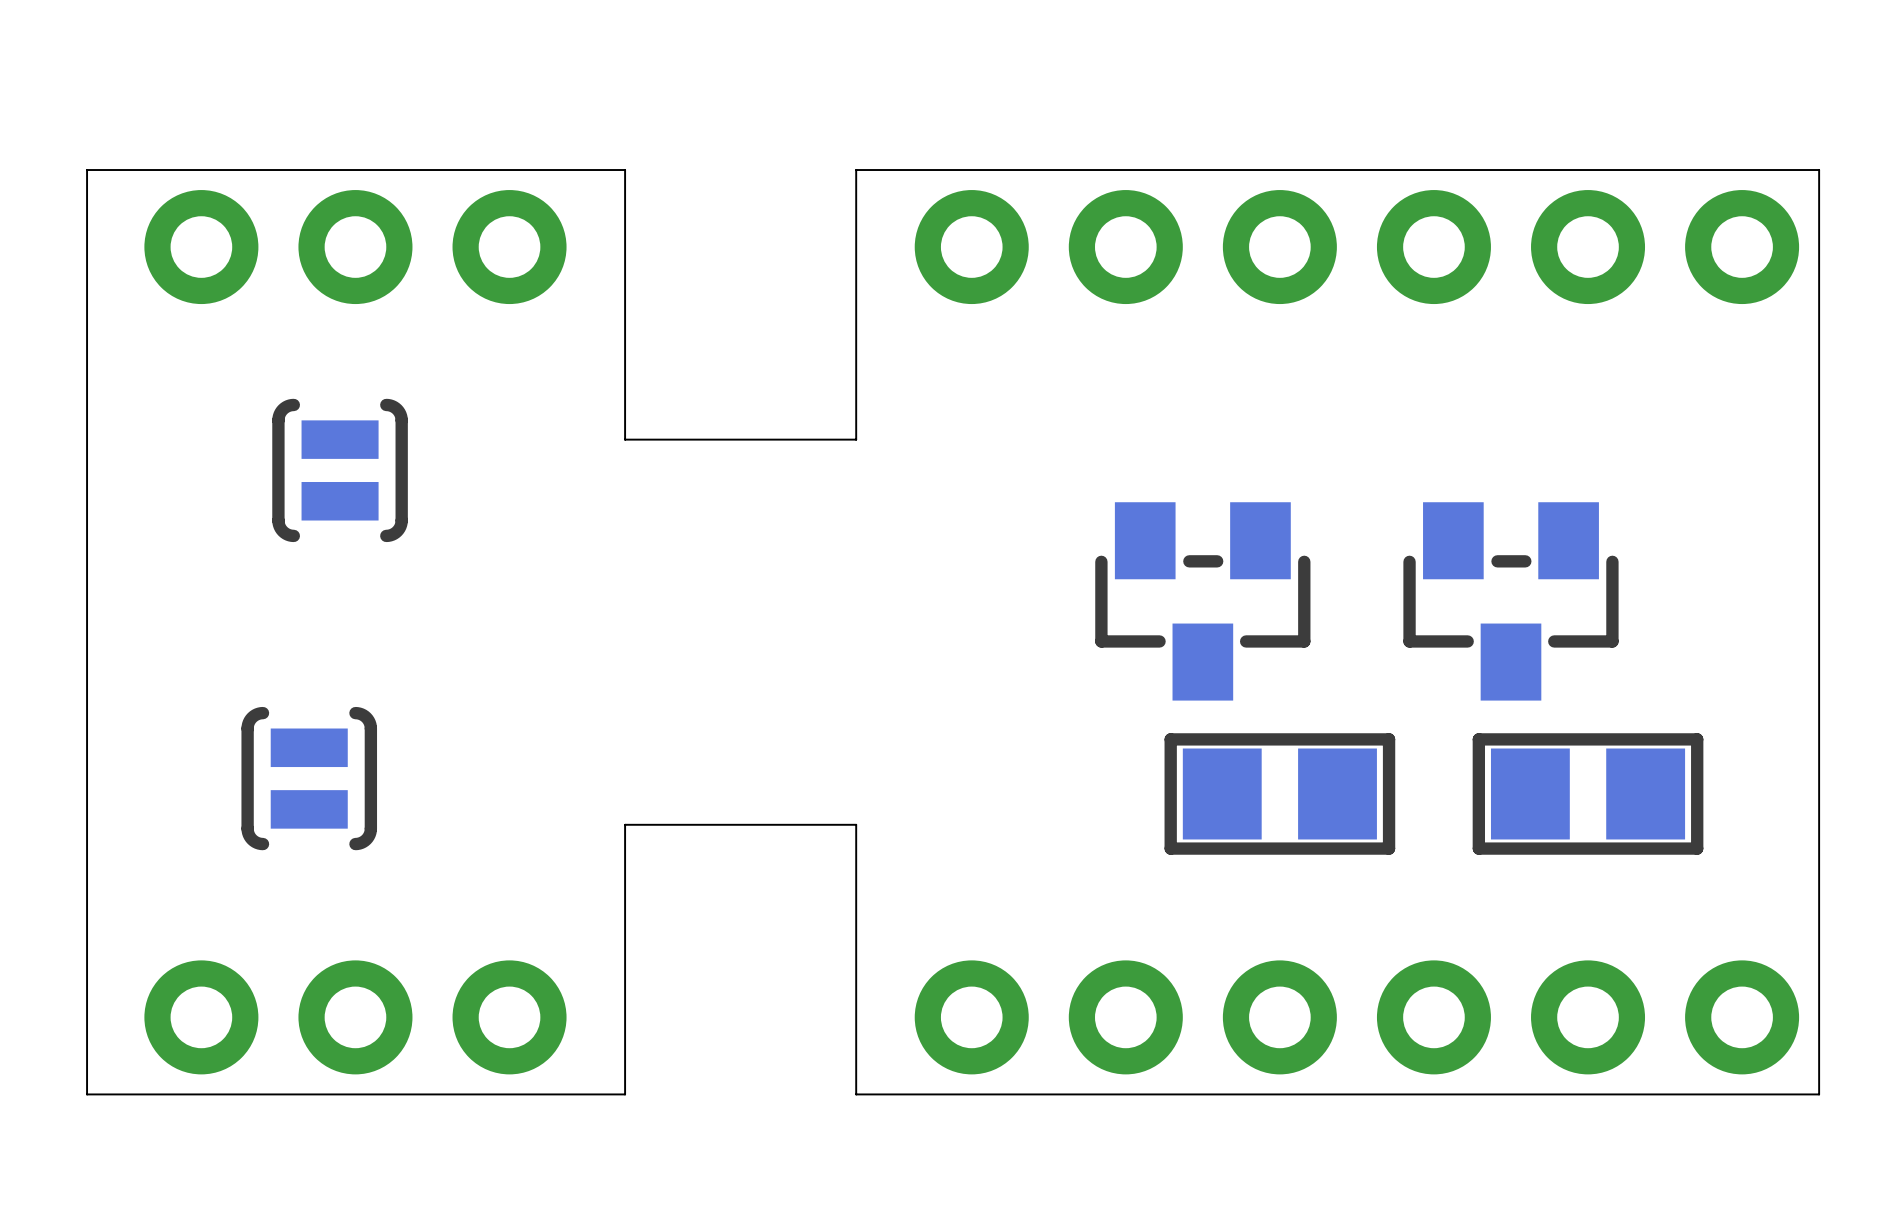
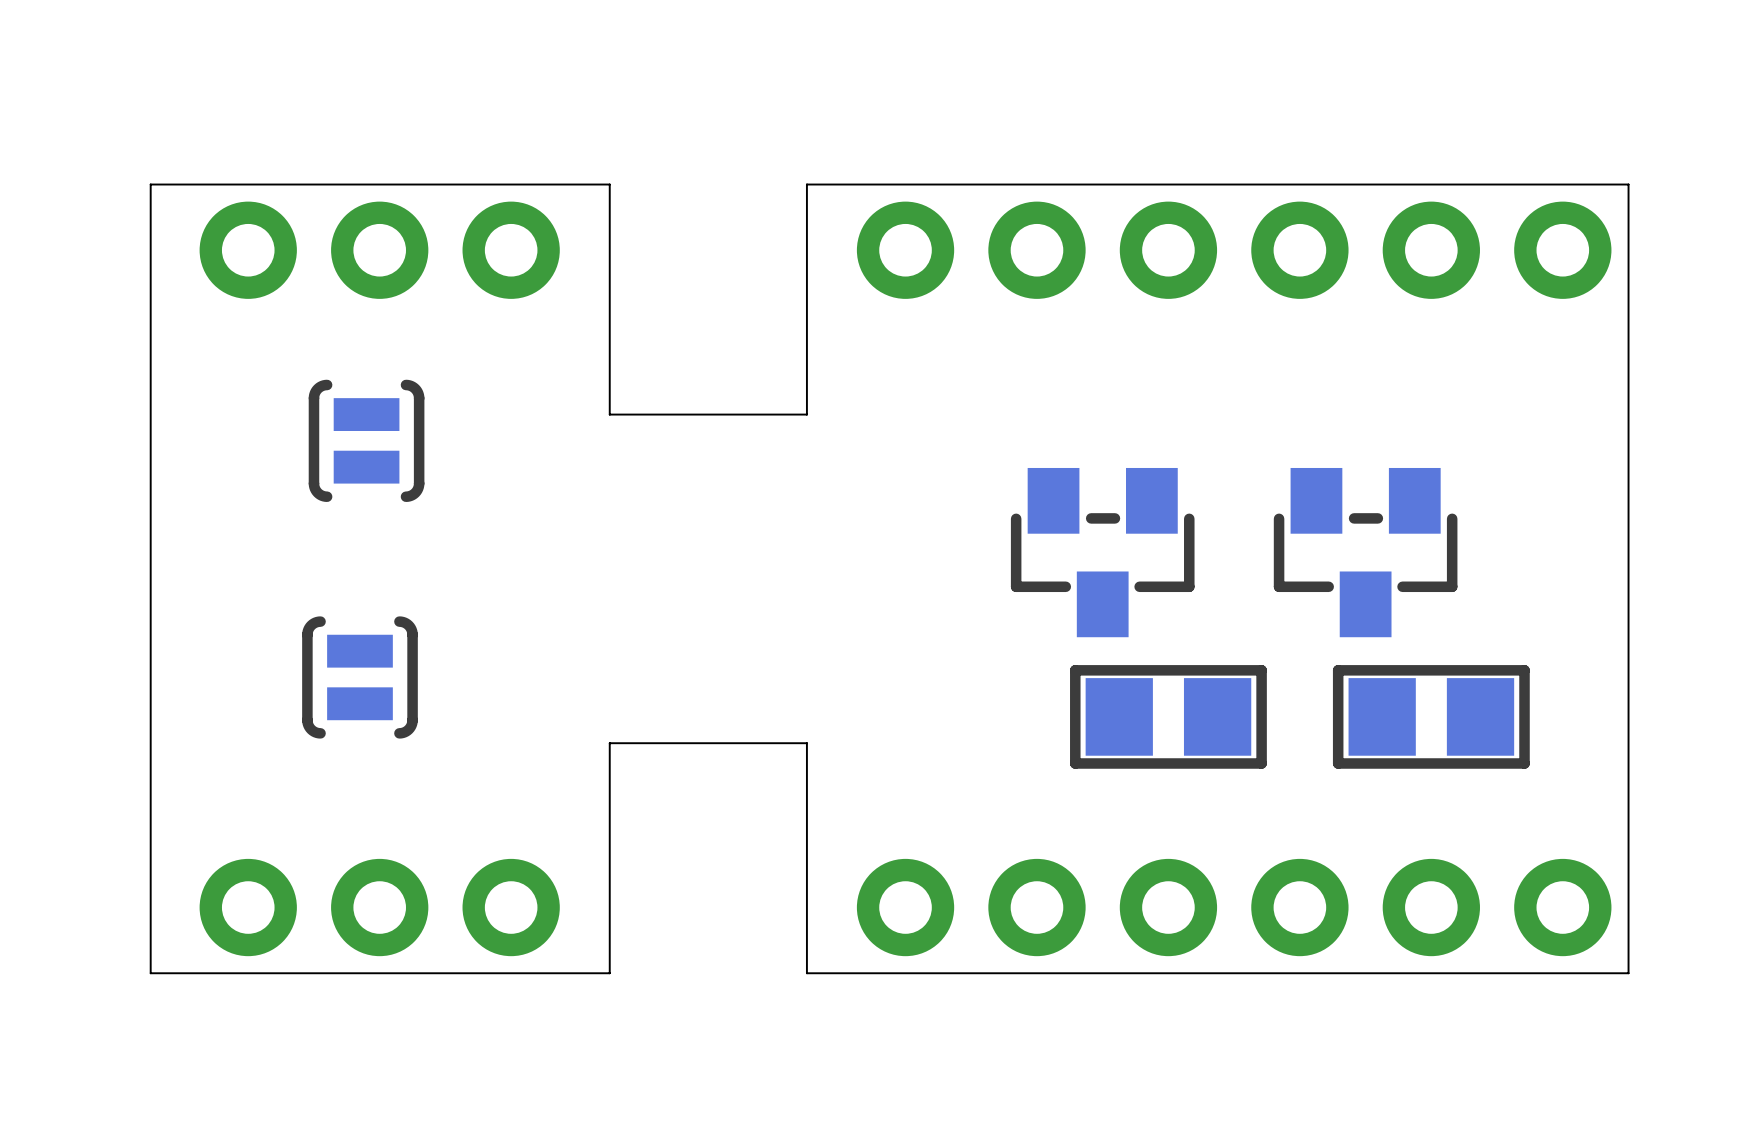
part position: (309, 778) -> (359, 677)

